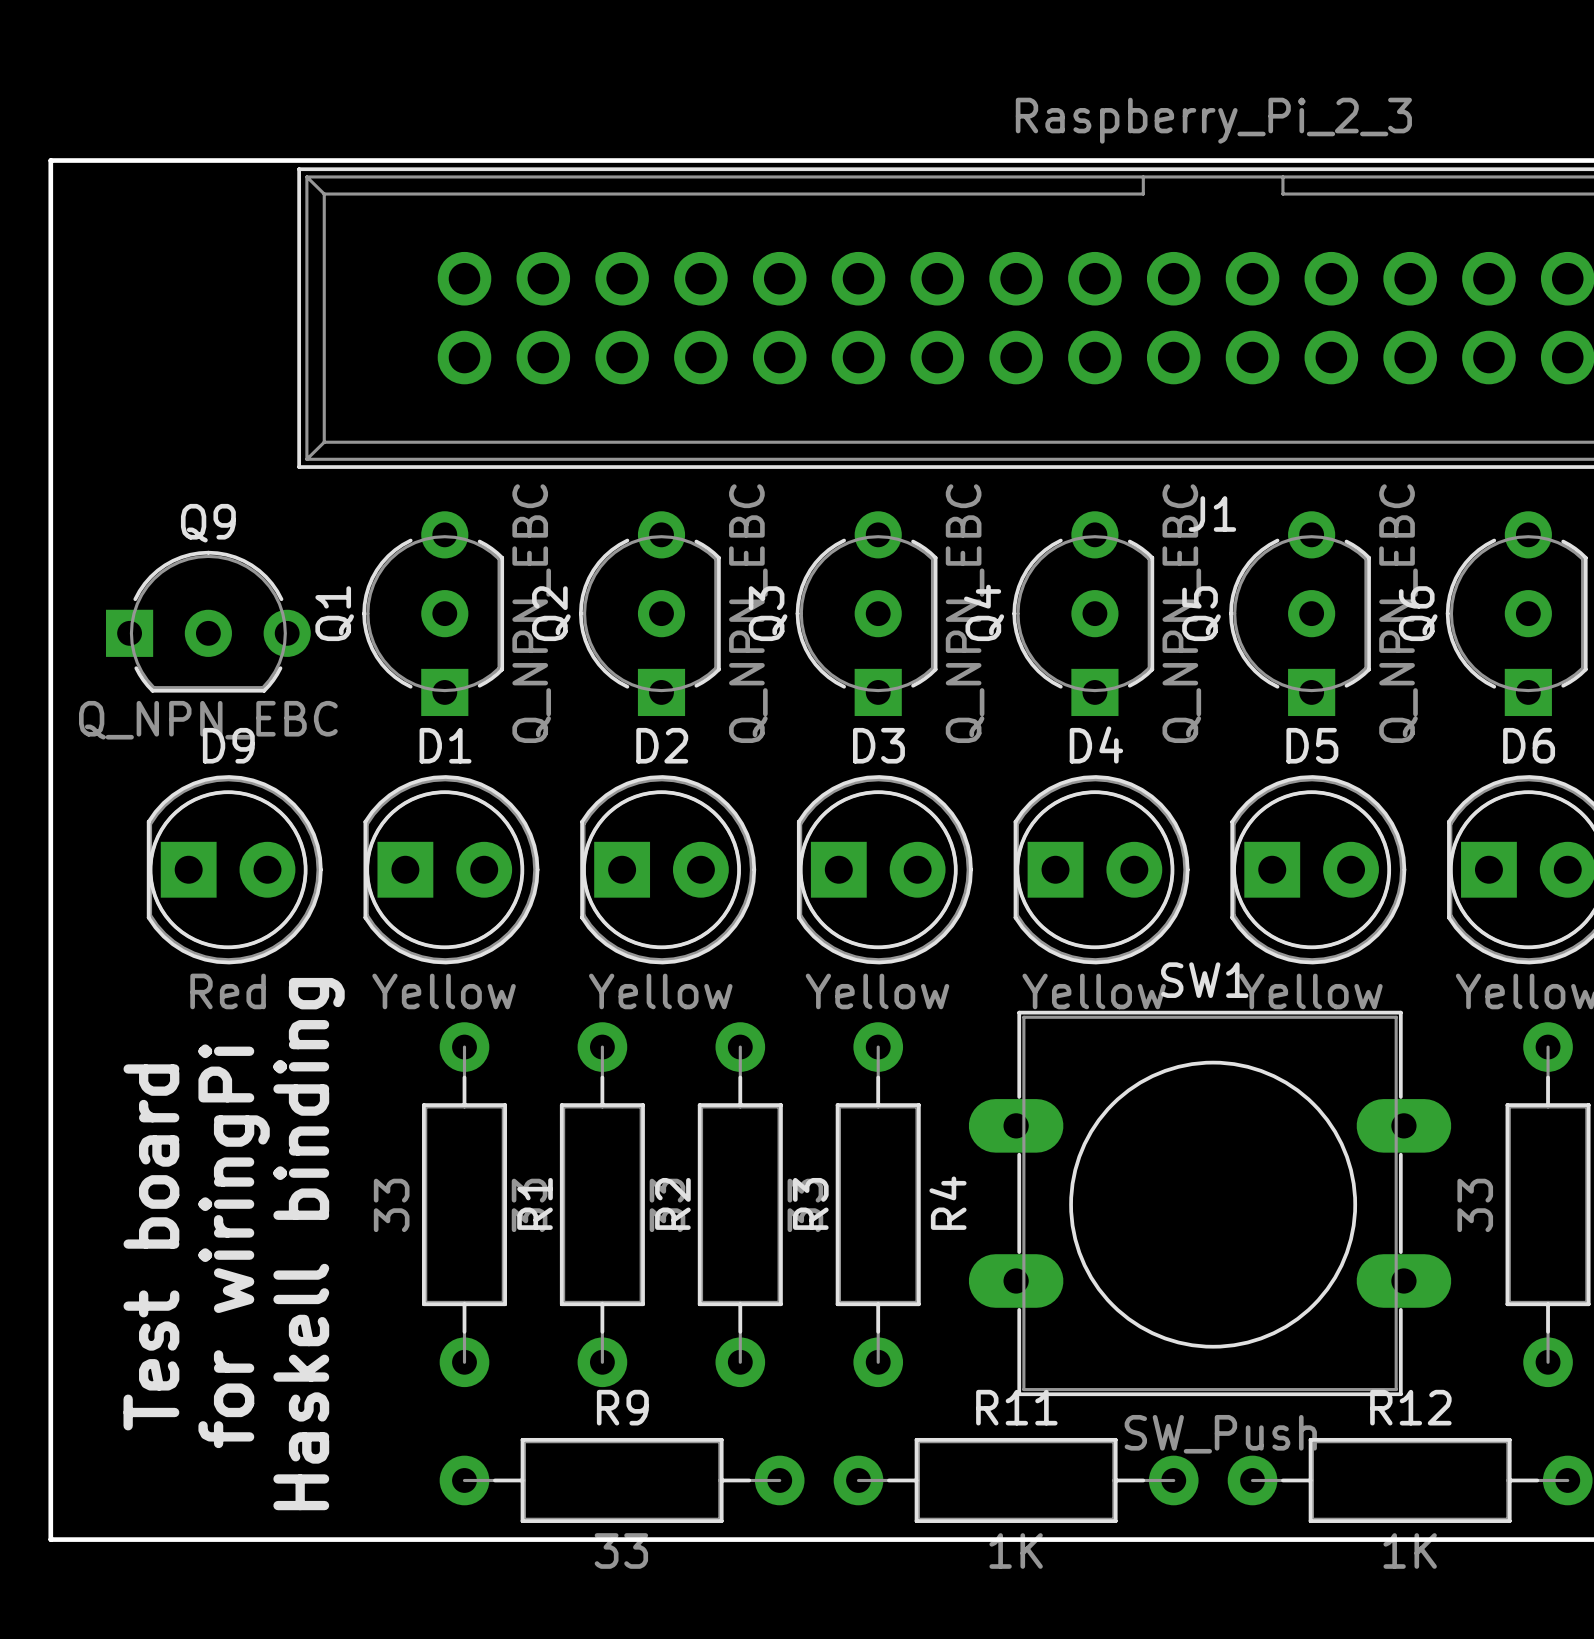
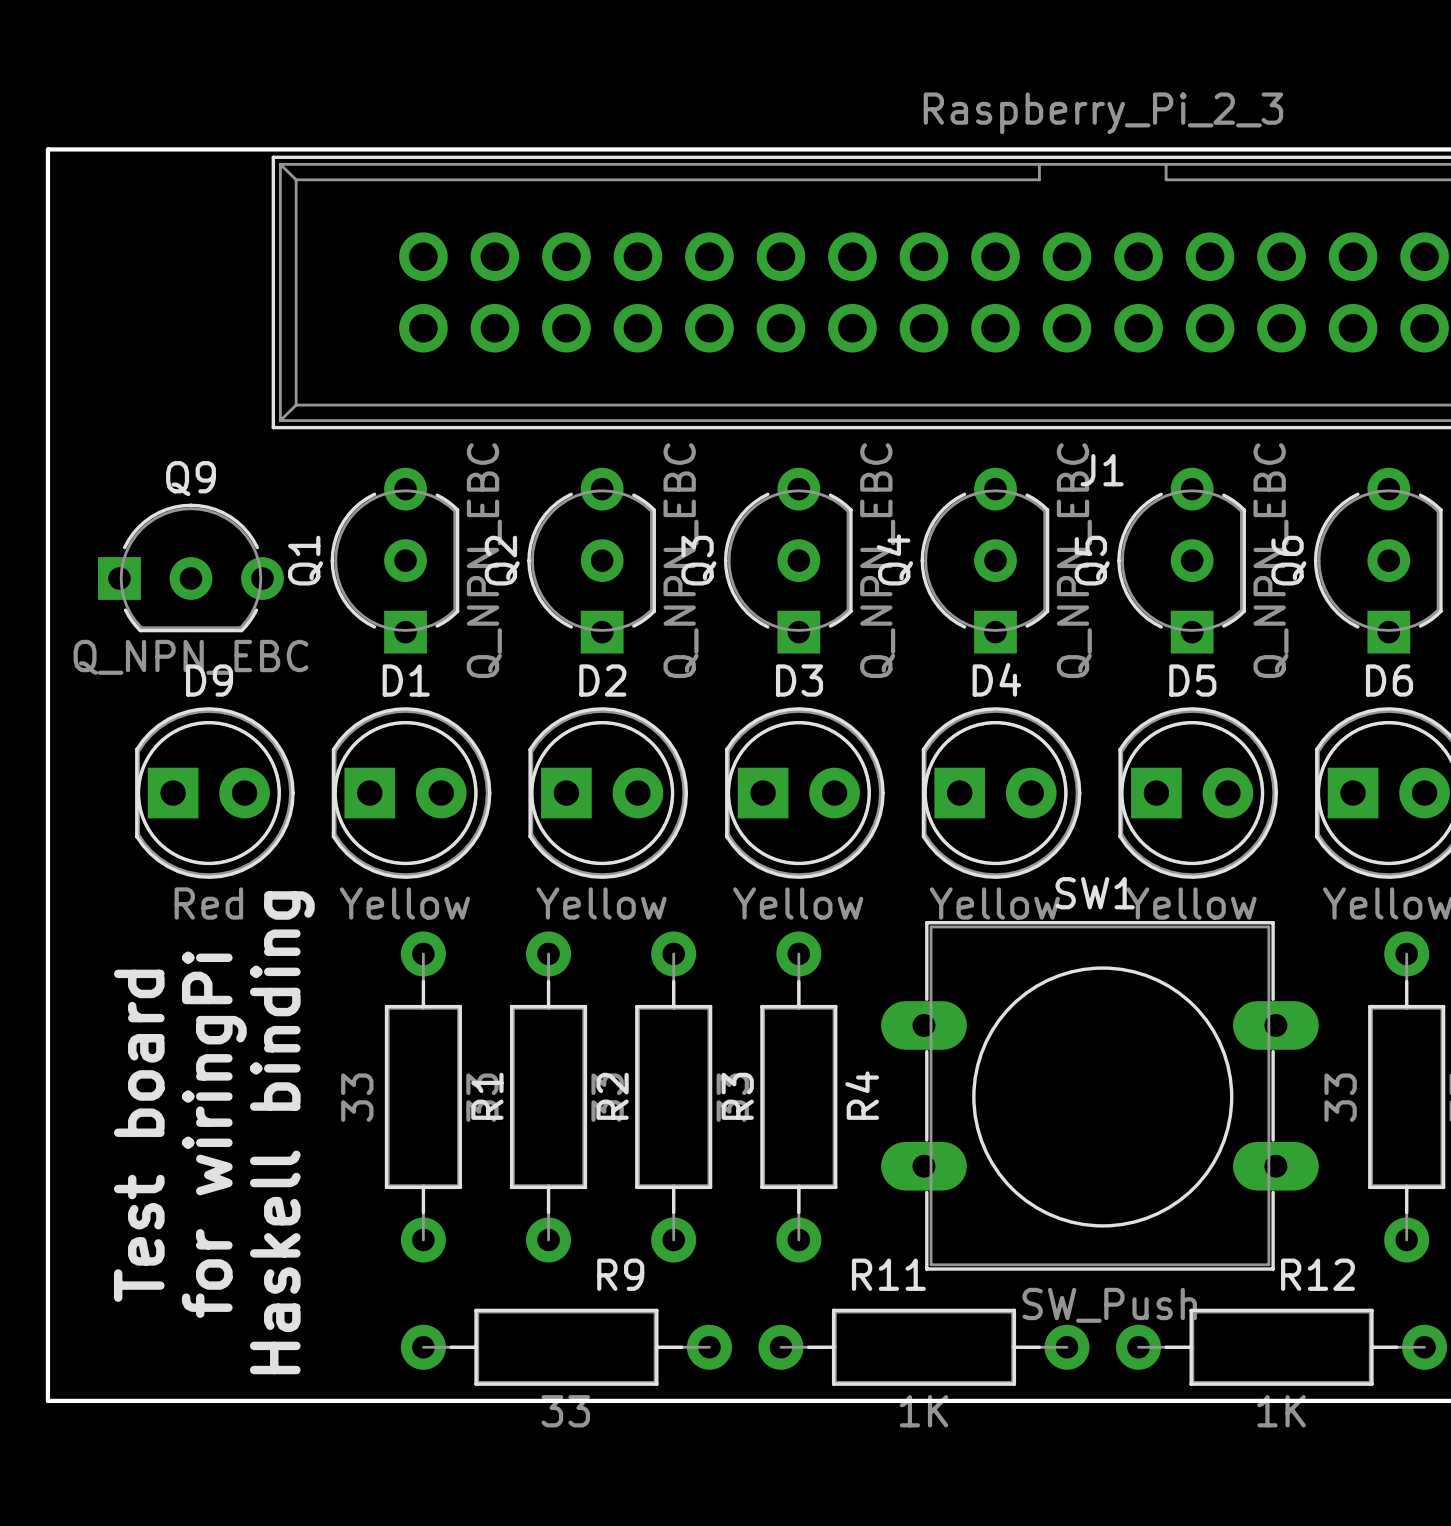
R9 name position: R9 (622, 1407) -> R9 (620, 1274)
R11 name position: R11 (1016, 1407) -> R11 (888, 1274)
R12 name position: R12 (1410, 1407) -> R12 (1317, 1274)

